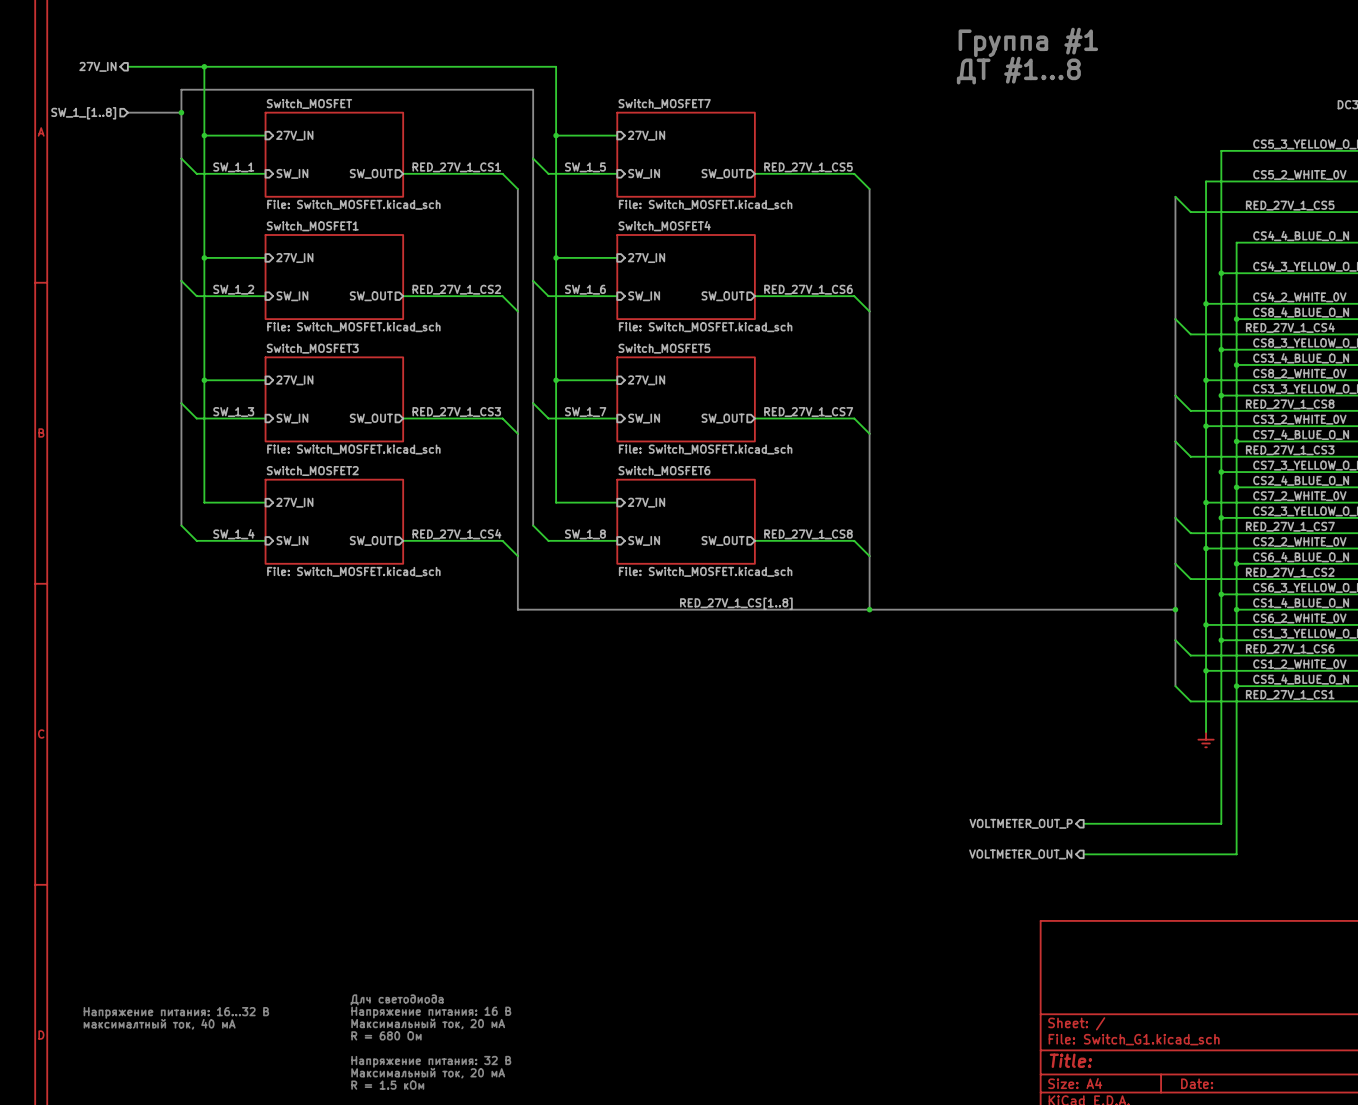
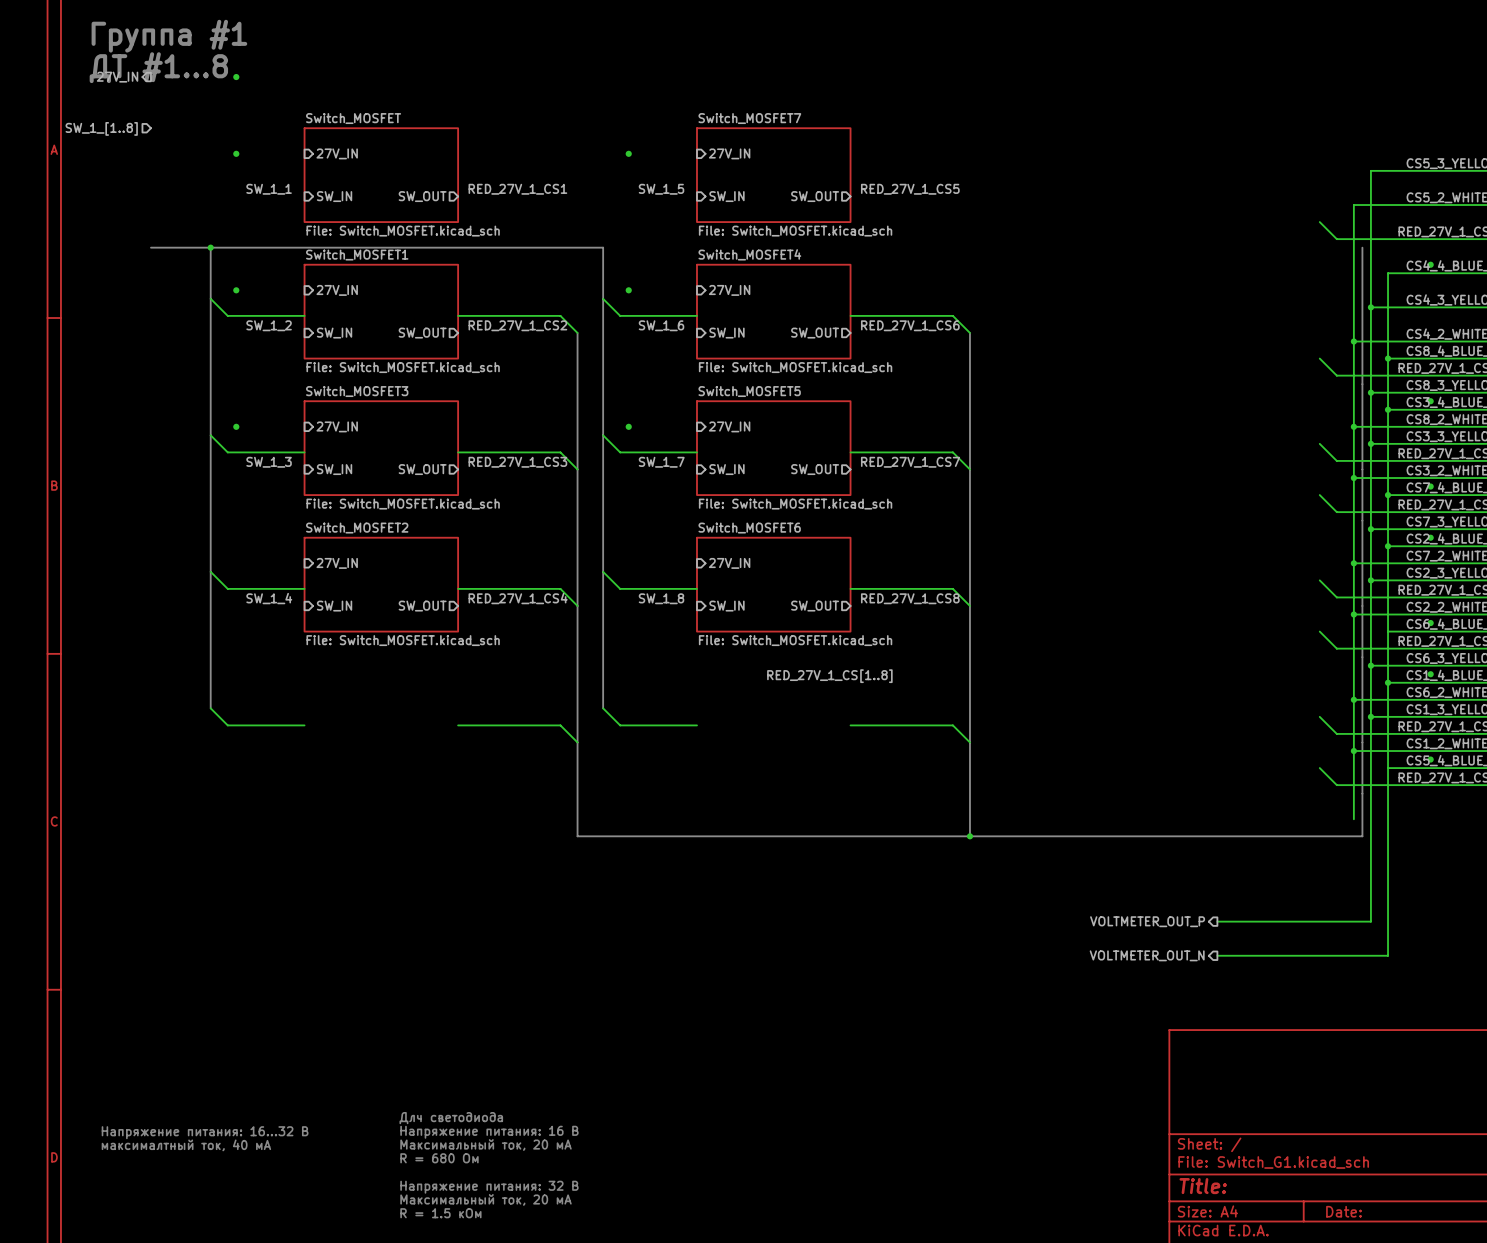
text: none -> Группа #1 (169, 36)
text: Группа #1 (1028, 42) -> none
text: none -> ДТ #1...8 (158, 67)
wire: (127, 66) (556, 66) (556, 502) (617, 502) -> none
wire: (204, 66) (204, 502) (265, 502) -> none
text: ДТ #1...8 (1018, 70) -> none
bus: (127, 112) (181, 112) -> none
junction: (181, 112) -> none
wire: (204, 135) (265, 135) -> none
wire: (556, 135) (617, 135) -> none
wire: (181, 158) (196, 173) (265, 173) -> (210, 298) (227, 315) (304, 315)
wire: (533, 158) (548, 173) (617, 173) -> (603, 298) (620, 315) (696, 315)
wire: (403, 173) (502, 173) (517, 189) -> none
wire: (754, 173) (854, 173) (869, 189) -> none
bus: (517, 189) (517, 609) (1175, 609) -> none
bus: (869, 189) (869, 609) -> none
bus: (1175, 196) (1175, 686) -> none
bus: (181, 219) (181, 89) (533, 89) (533, 219) -> (150, 247) (603, 247)
junction: none -> (210, 247)
bus: none -> (1362, 247) (1362, 836) (577, 836) (577, 332)
junction: none -> (1430, 264)
wire: (204, 257) (265, 257) -> none
wire: (556, 257) (617, 257) -> none
wire: (181, 280) (196, 296) (265, 296) -> (210, 435) (227, 452) (304, 452)
wire: none -> (458, 315) (560, 315) (577, 332)
wire: (533, 280) (548, 296) (617, 296) -> (603, 435) (620, 452) (696, 452)
wire: none -> (850, 315) (952, 315) (969, 332)
wire: (403, 296) (502, 296) (517, 311) -> none
wire: (754, 296) (854, 296) (869, 311) -> none
bus: none -> (969, 332) (969, 836)
junction: none -> (1430, 401)
wire: (204, 380) (265, 380) -> none
wire: (556, 380) (617, 380) -> none
wire: (181, 403) (196, 418) (265, 418) -> (210, 571) (227, 588) (304, 588)
wire: none -> (458, 452) (560, 452) (577, 469)
wire: (533, 403) (548, 418) (617, 418) -> (603, 571) (620, 588) (696, 588)
wire: none -> (850, 452) (952, 452) (969, 469)
wire: (403, 418) (502, 418) (517, 433) -> none
wire: (754, 418) (854, 418) (869, 433) -> none
junction: none -> (1430, 486)
junction: none -> (1430, 537)
wire: (181, 525) (196, 540) (265, 540) -> (210, 708) (227, 725) (304, 725)
bus: none -> (210, 588) (210, 708)
wire: none -> (458, 588) (560, 588) (577, 605)
wire: (533, 525) (548, 540) (617, 540) -> (603, 708) (620, 725) (696, 725)
bus: none -> (603, 588) (603, 708)
wire: none -> (850, 588) (952, 588) (969, 605)
wire: (403, 540) (502, 540) (517, 556) -> none
wire: (754, 540) (854, 540) (869, 556) -> none
junction: none -> (1430, 623)
junction: (1236, 563) -> none
junction: none -> (1430, 674)
junction: (869, 609) -> none
junction: (1175, 609) -> none
wire: none -> (458, 725) (560, 725) (577, 742)
wire: none -> (850, 725) (952, 725) (969, 742)
junction: none -> (1430, 759)
junction: (1236, 686) -> none
power symbol: (1206, 739) -> none
junction: none -> (969, 836)

